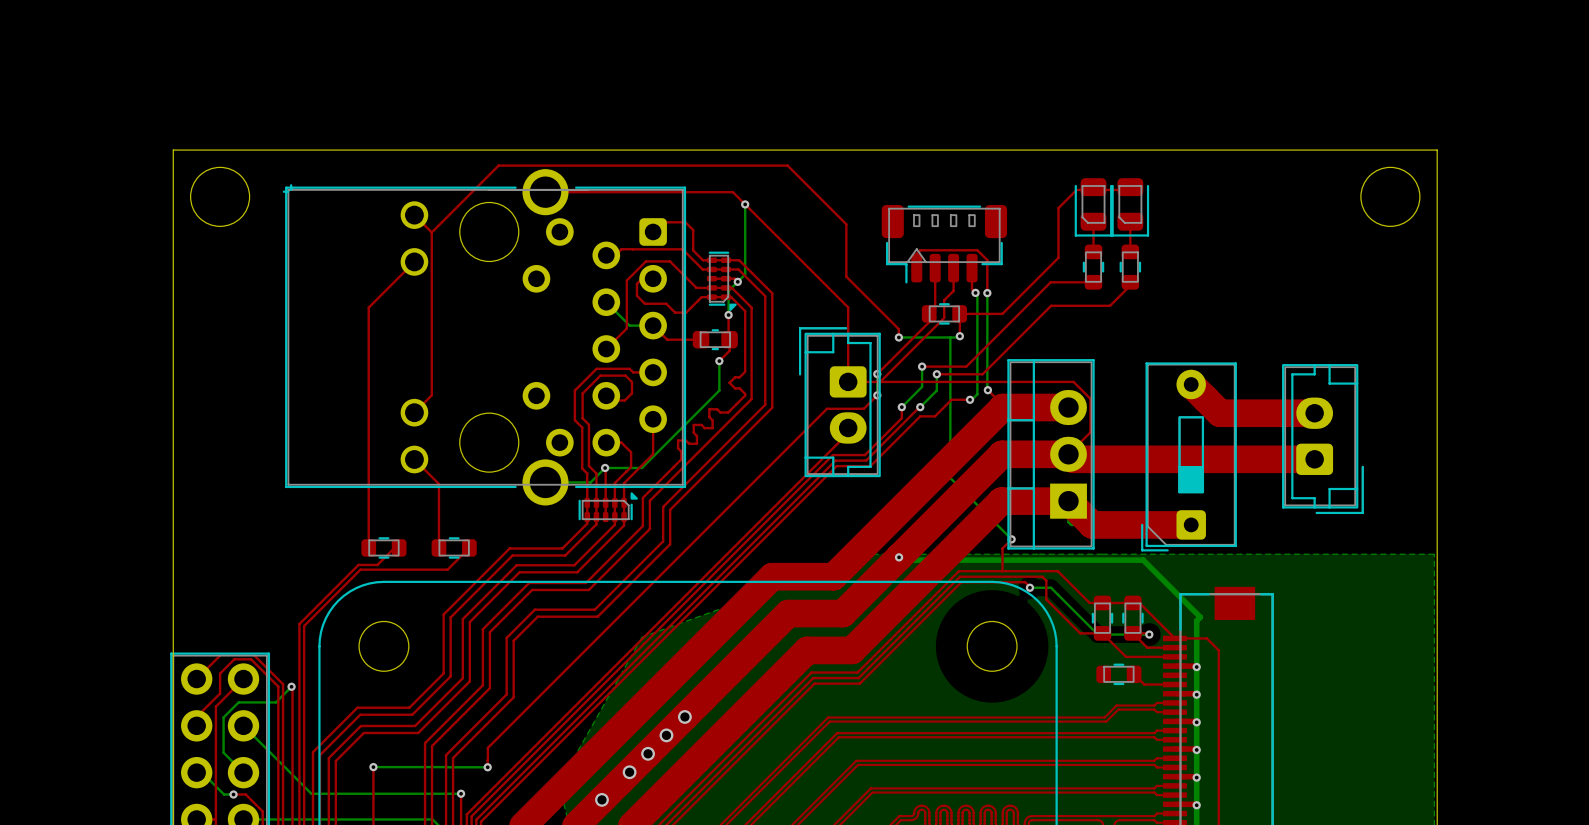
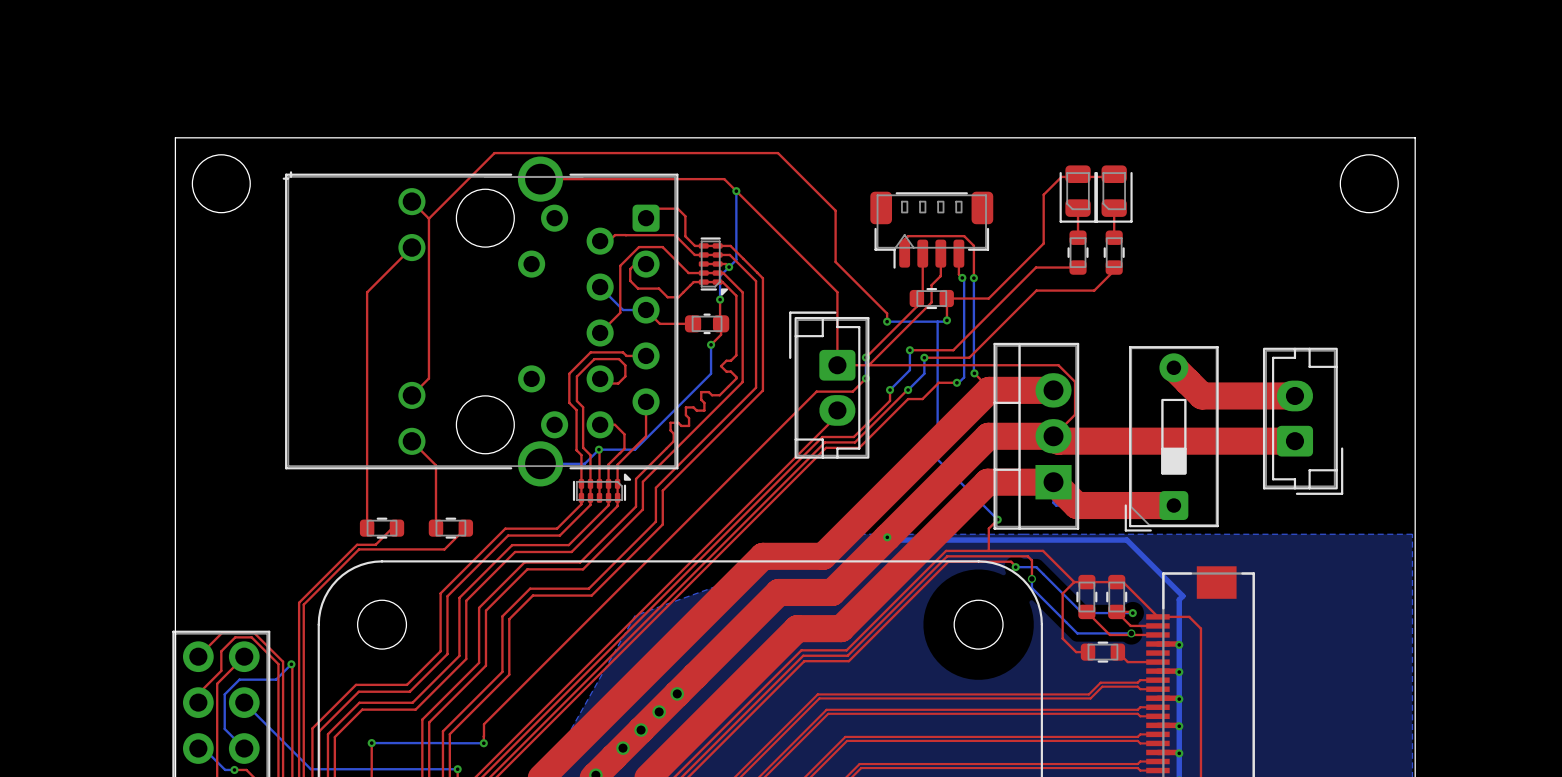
top track: (1046, 580) (1046, 599) (1080, 633) (1102, 633) -> (1031, 560) (1031, 578)
bottom track: none -> (1031, 578) (1031, 587) (1077, 633) (1131, 633)
via: none -> (1031, 578)
top track: none -> (1074, 582) (1062, 593) (1062, 638) (1076, 652) (1088, 652)
via: none -> (1131, 633)

